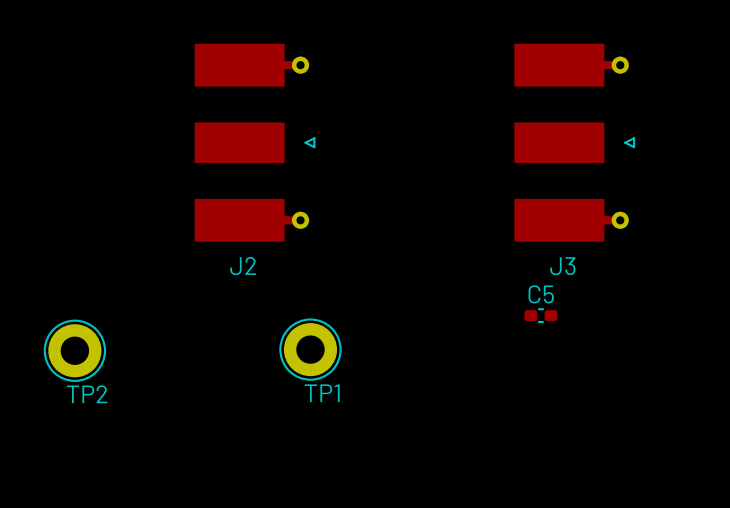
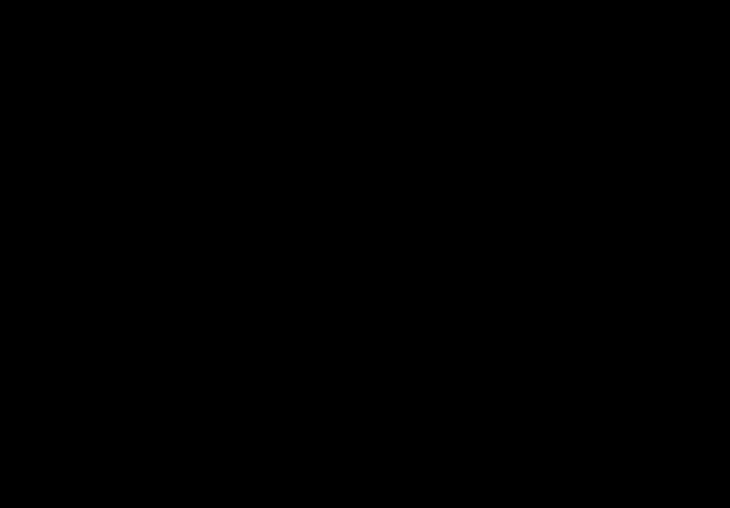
J2: (255, 142) -> none
J3: (574, 142) -> none
C5: (540, 315) -> none
TP1: (310, 349) -> none
TP2: (74, 350) -> none

